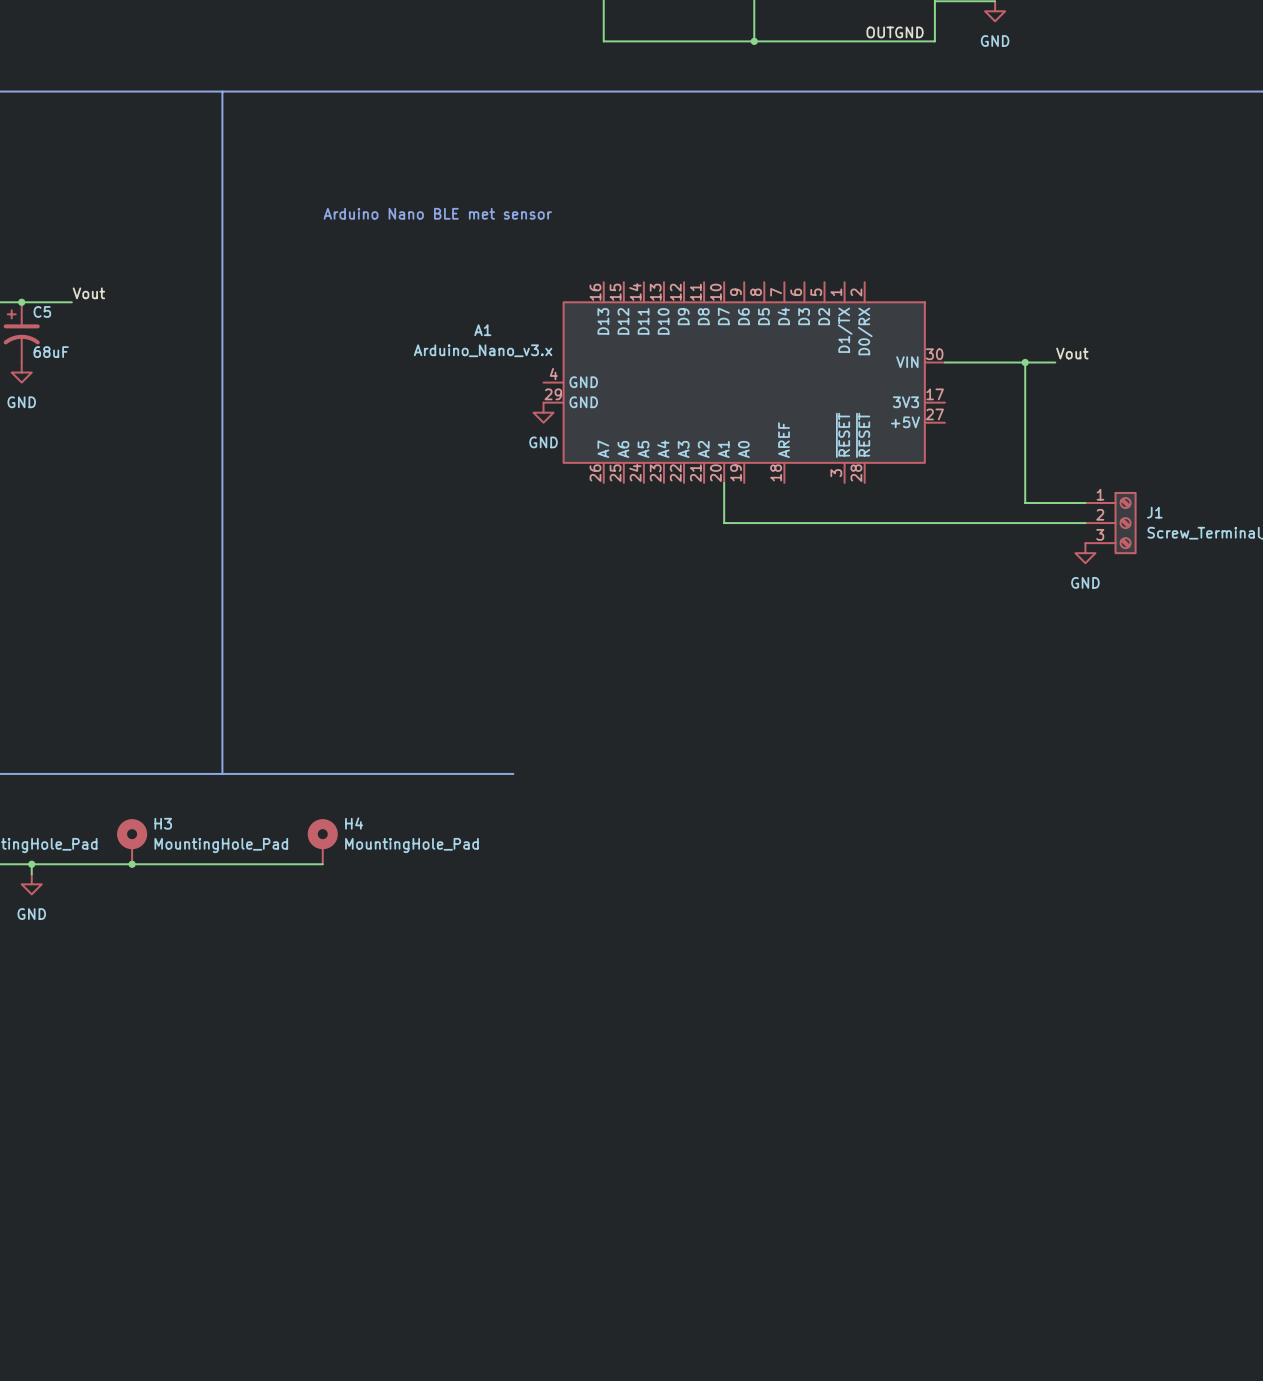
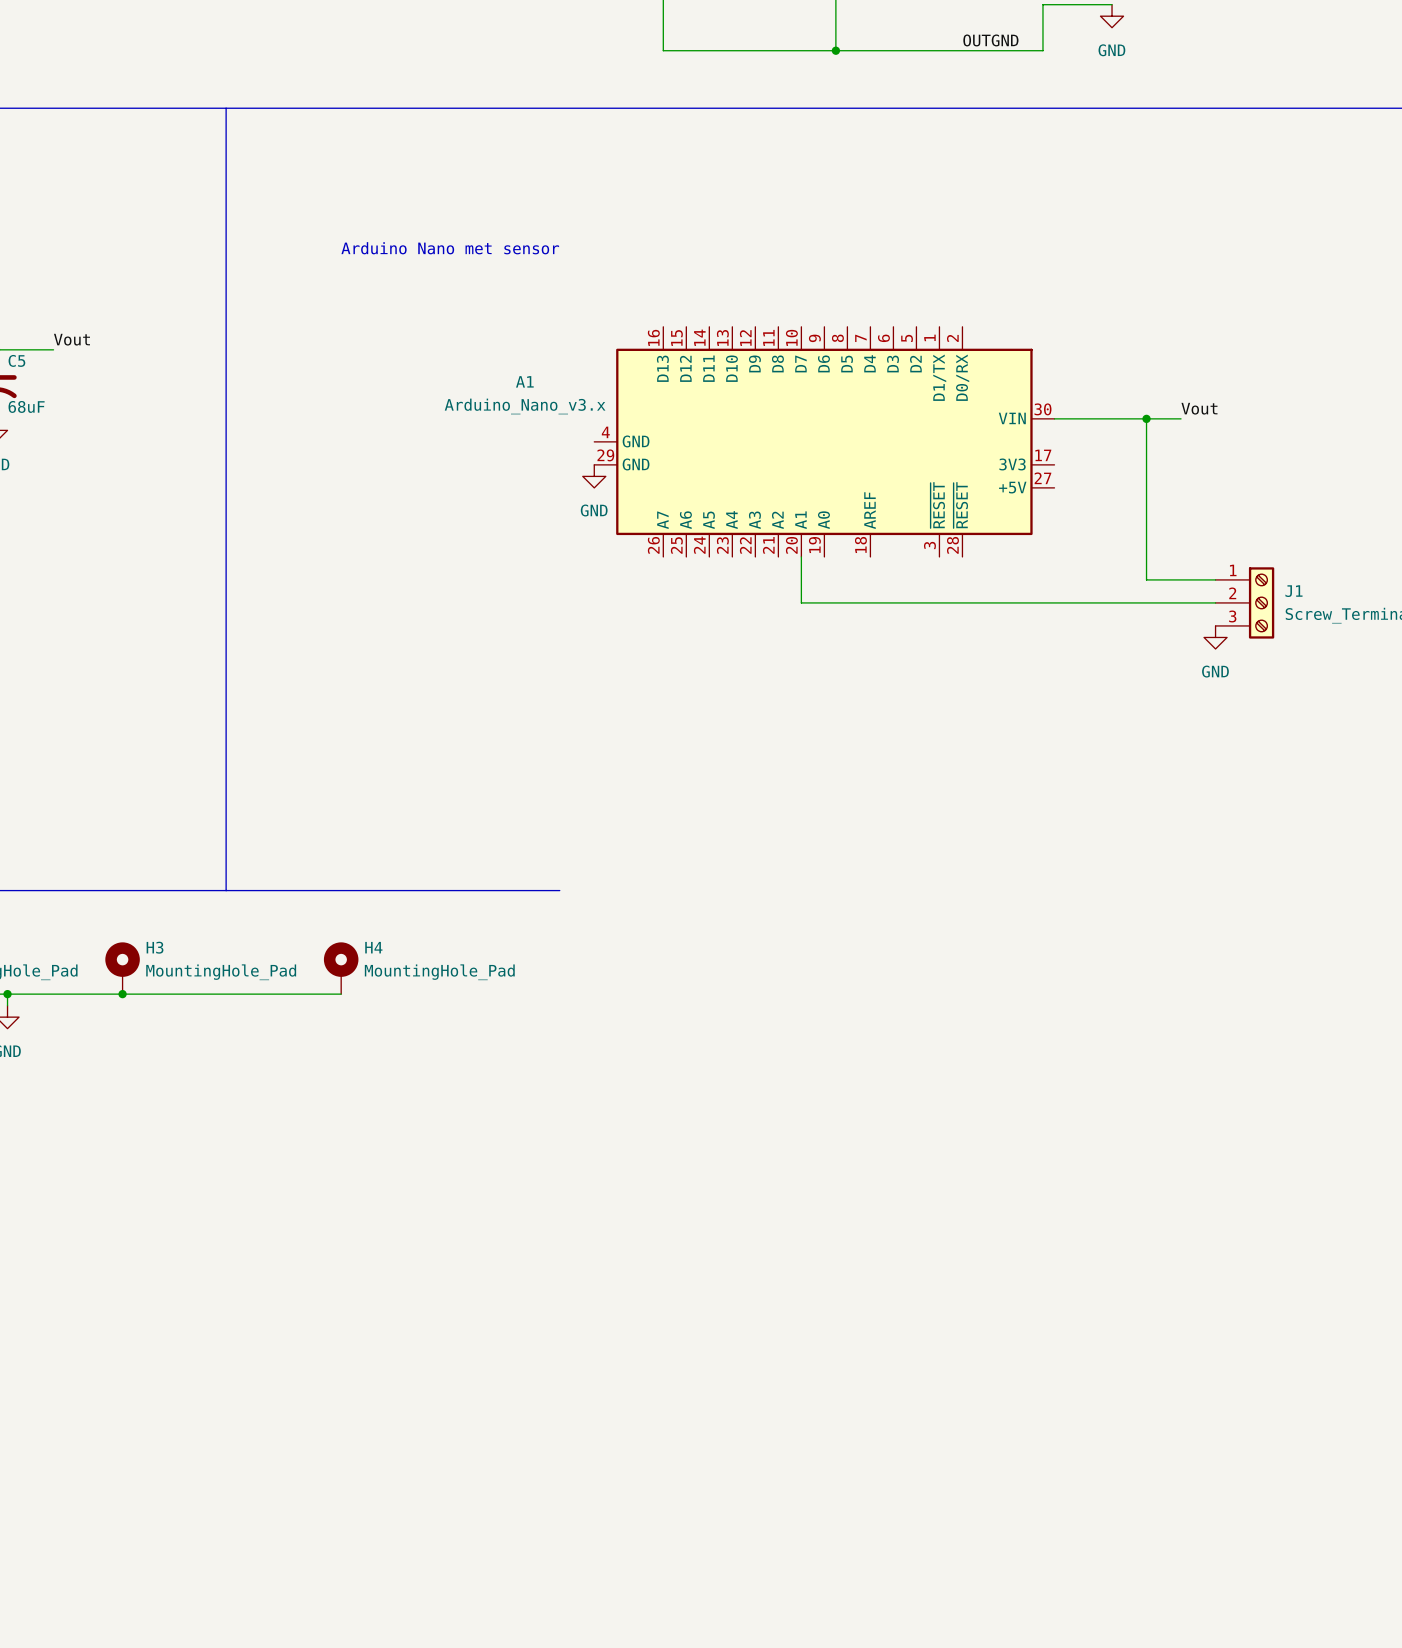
text: Arduino Nano BLE met sensor (437, 213) -> Arduino Nano met sensor (450, 248)

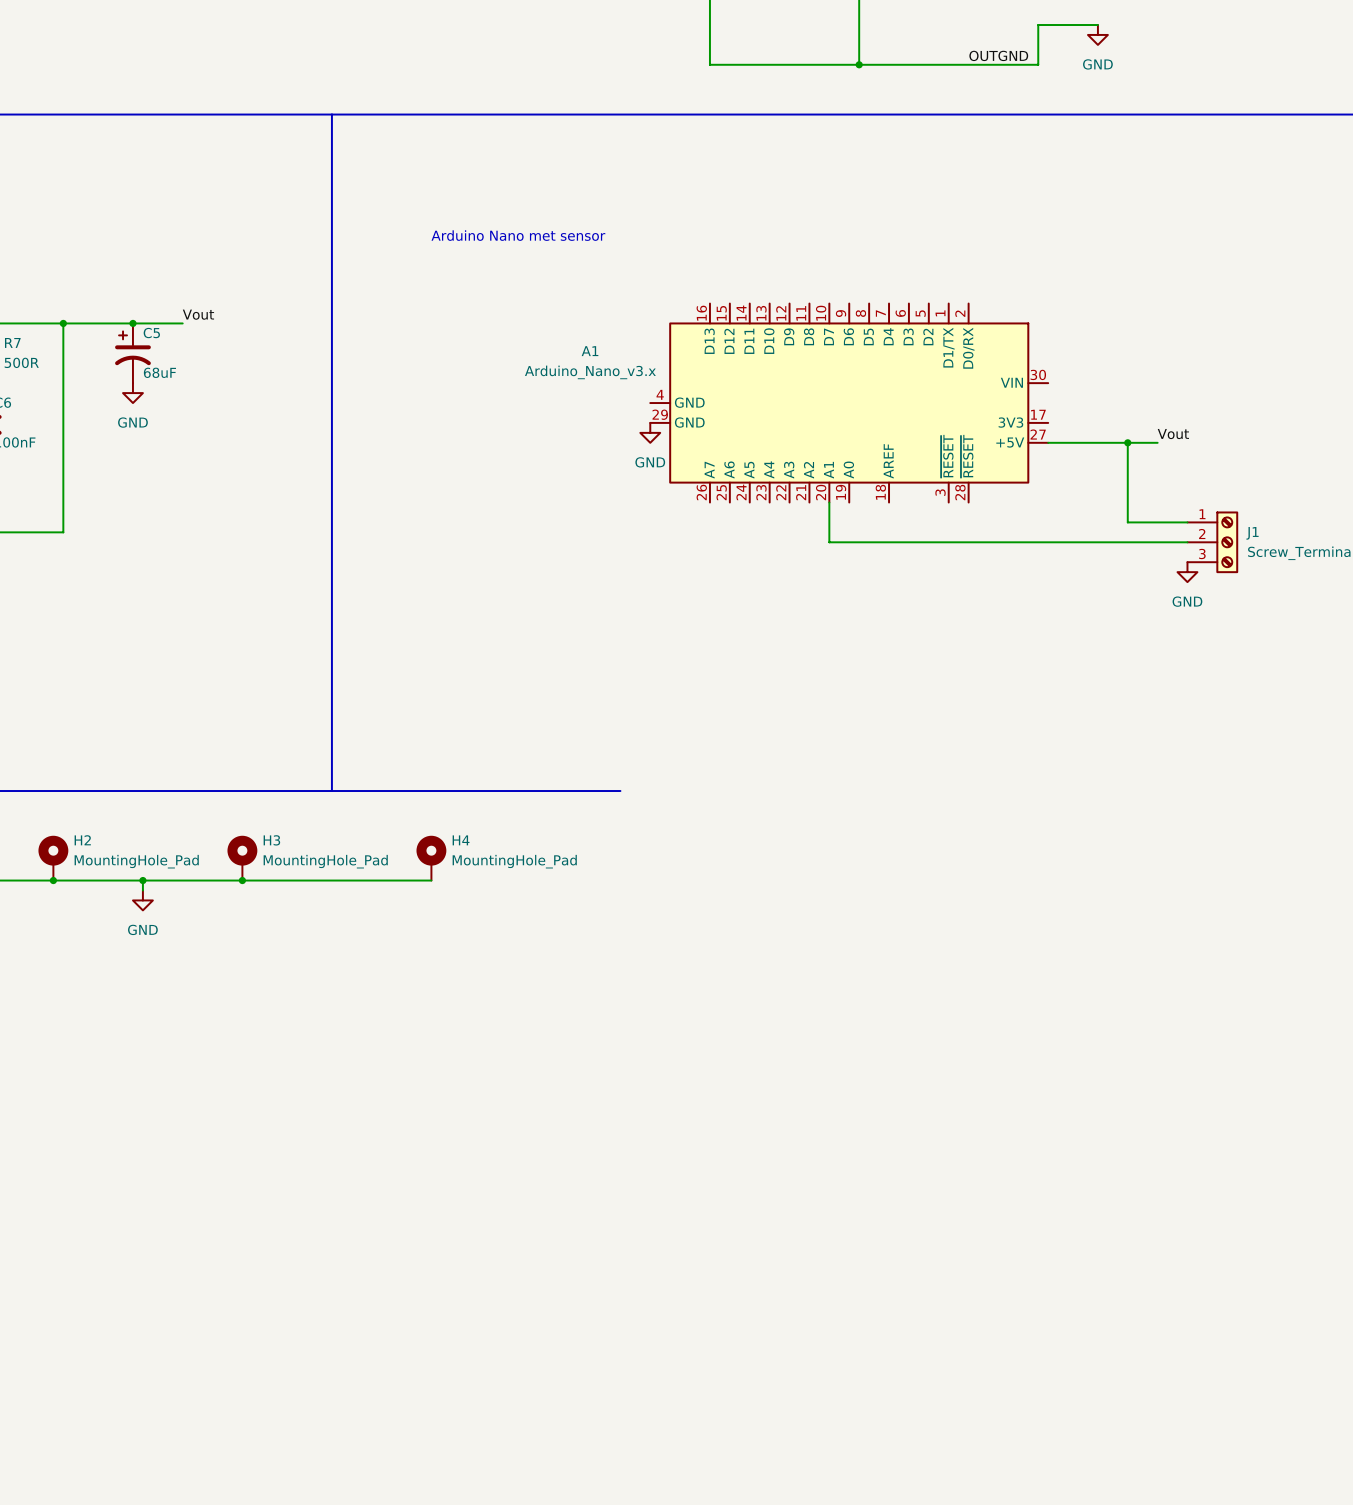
label position: Vout (1199, 408) -> Vout (1173, 434)
wire: (1054, 418) (1181, 418) -> (1048, 442) (1157, 442)
wire: (1146, 418) (1146, 487) -> none
junction: (1146, 418) -> none
junction: none -> (1127, 442)

